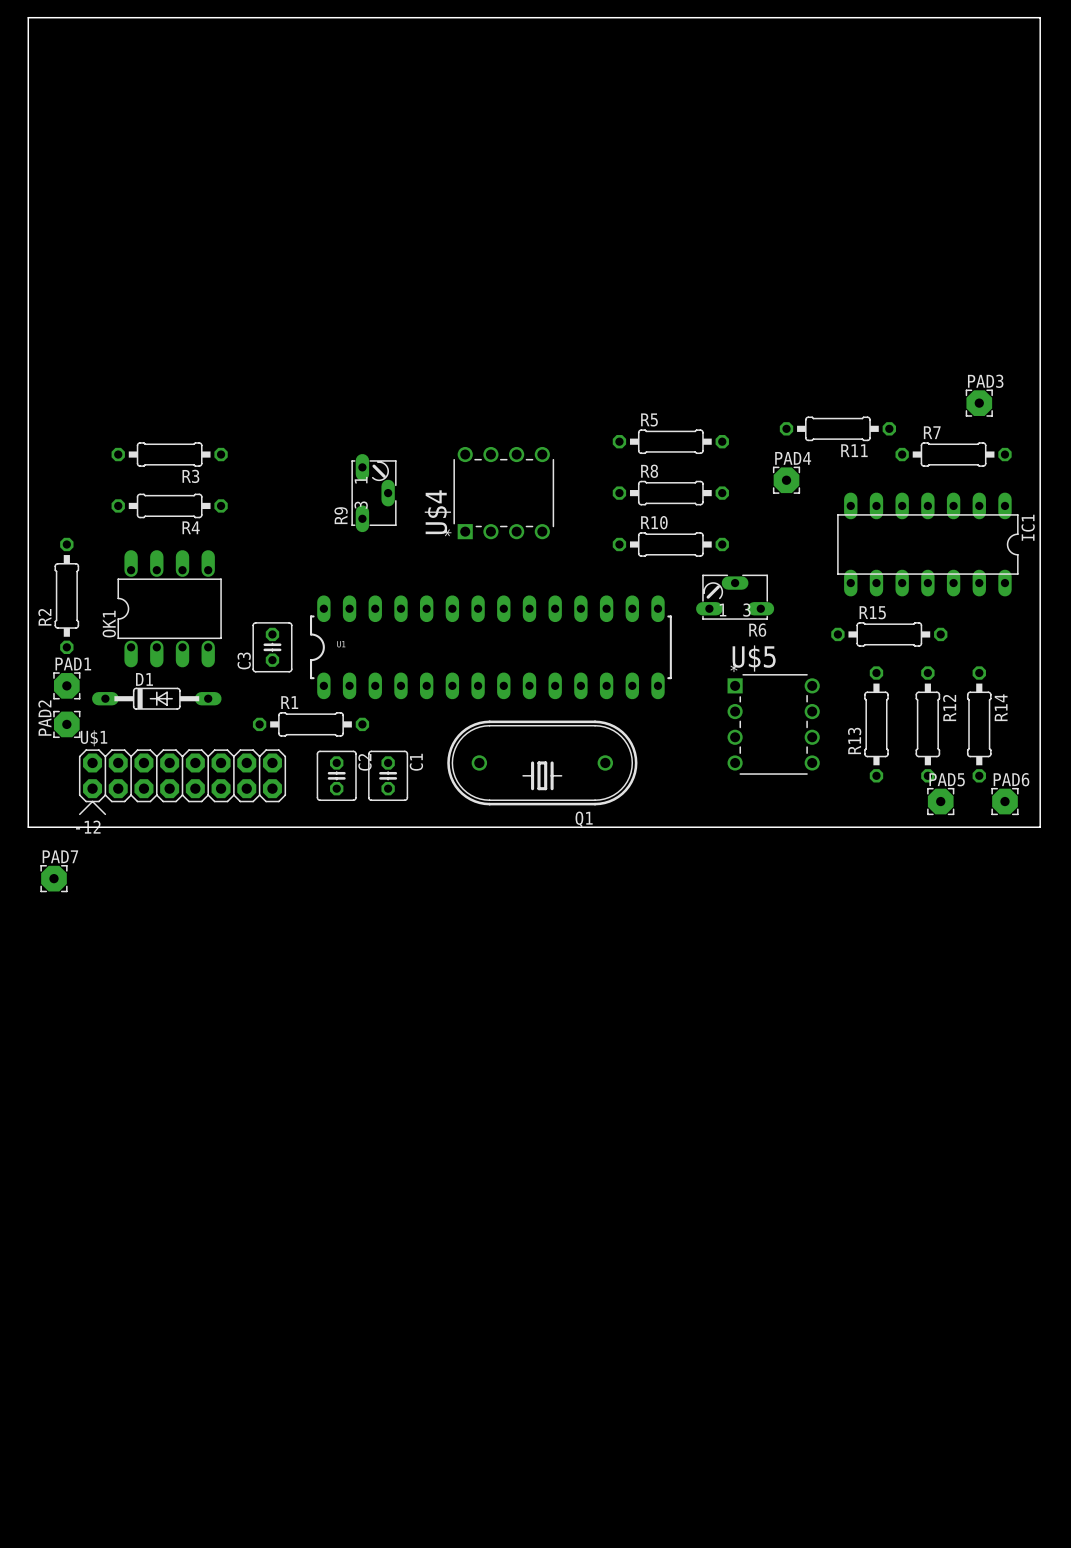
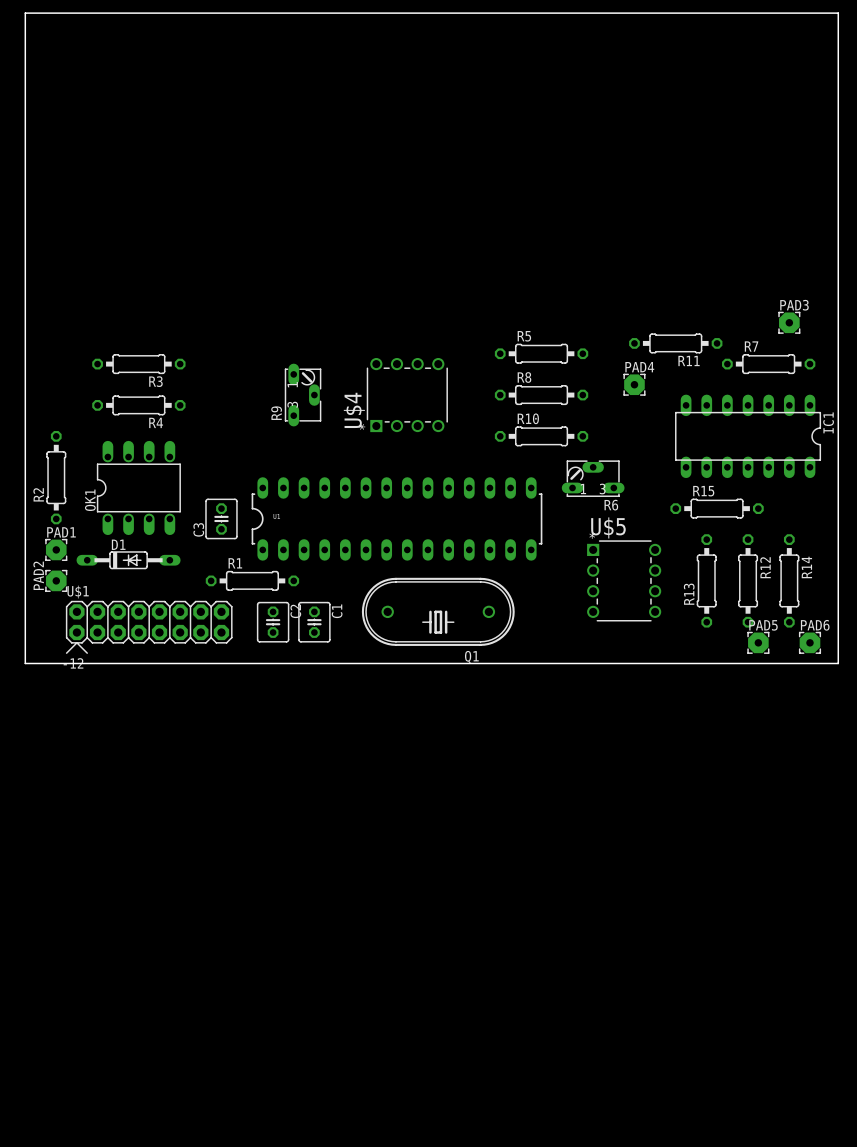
PAD7: (53, 878) -> none

